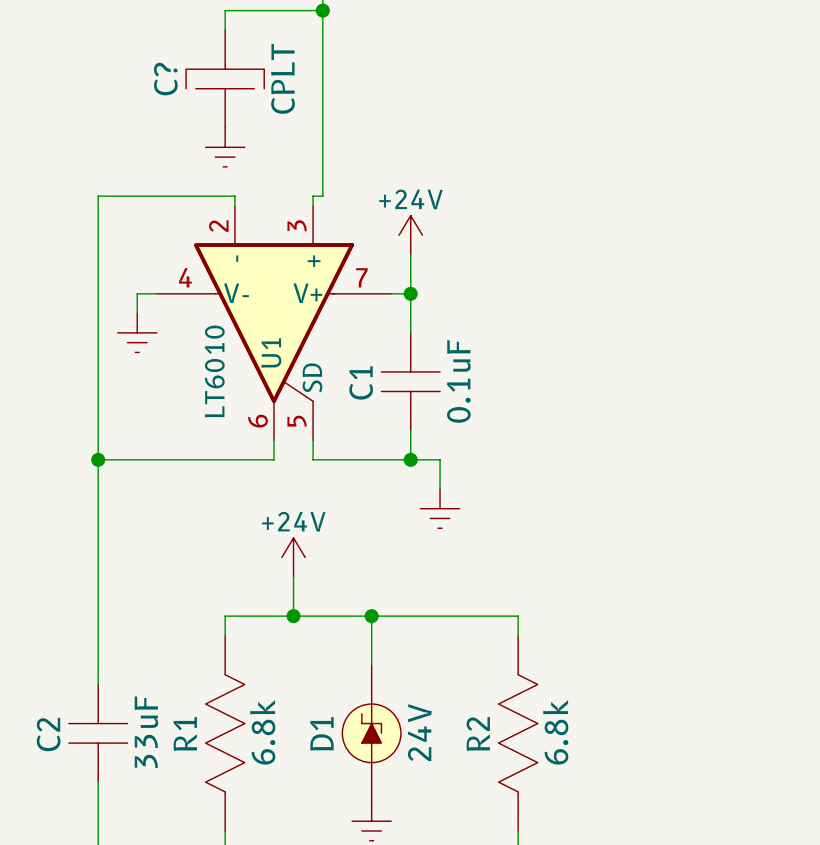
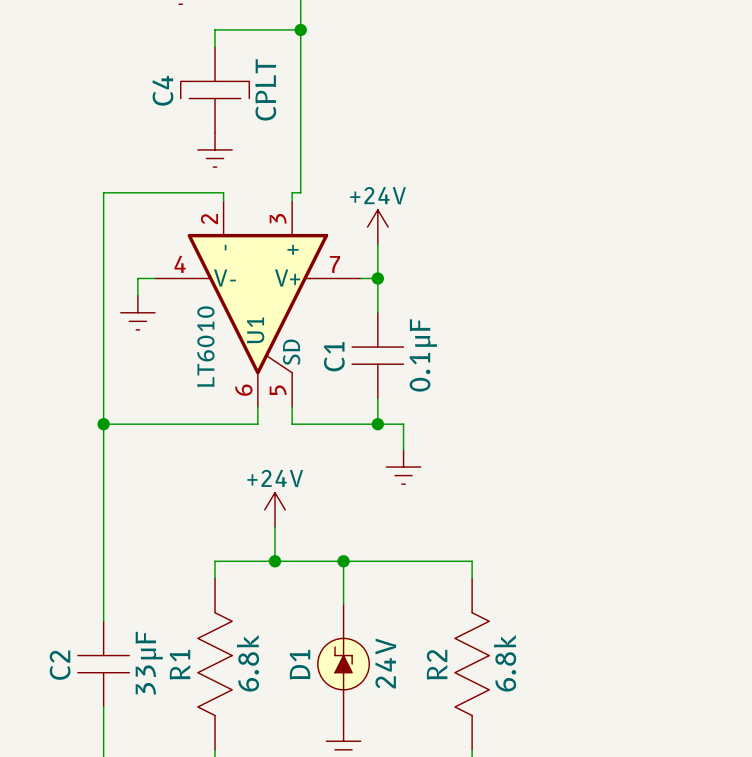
C? name: C? (165, 79) -> C4 (162, 90)
C1 value: 0.1uF (458, 381) -> 0.1μF (423, 355)
C2 value: 33uF (146, 732) -> 33μF (149, 663)

